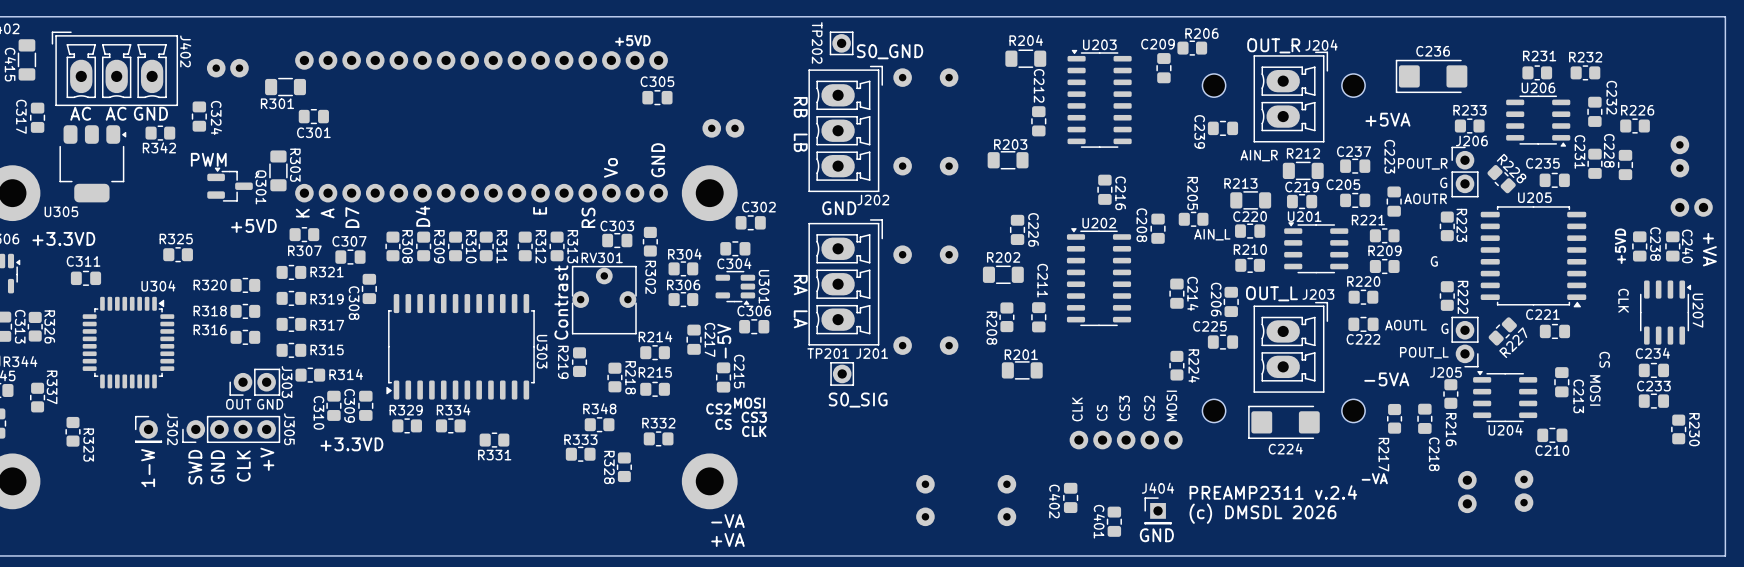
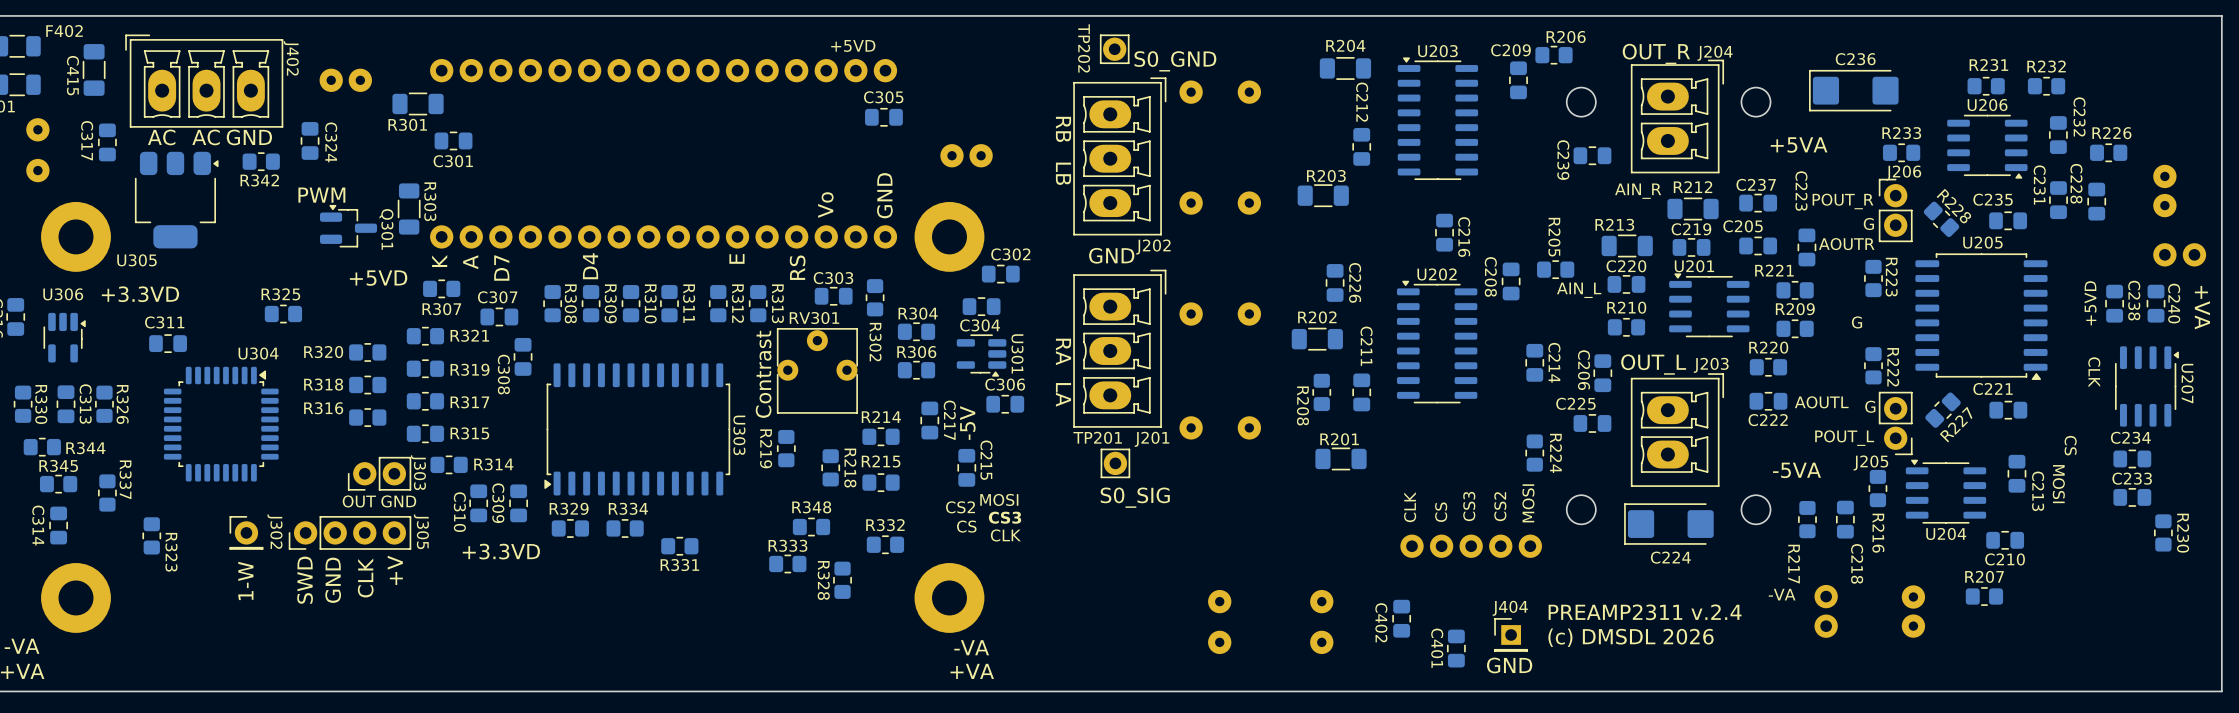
R207: none -> (1984, 596)
part position: (1524, 491) -> (1913, 611)
part position: (1467, 492) -> (1826, 611)

